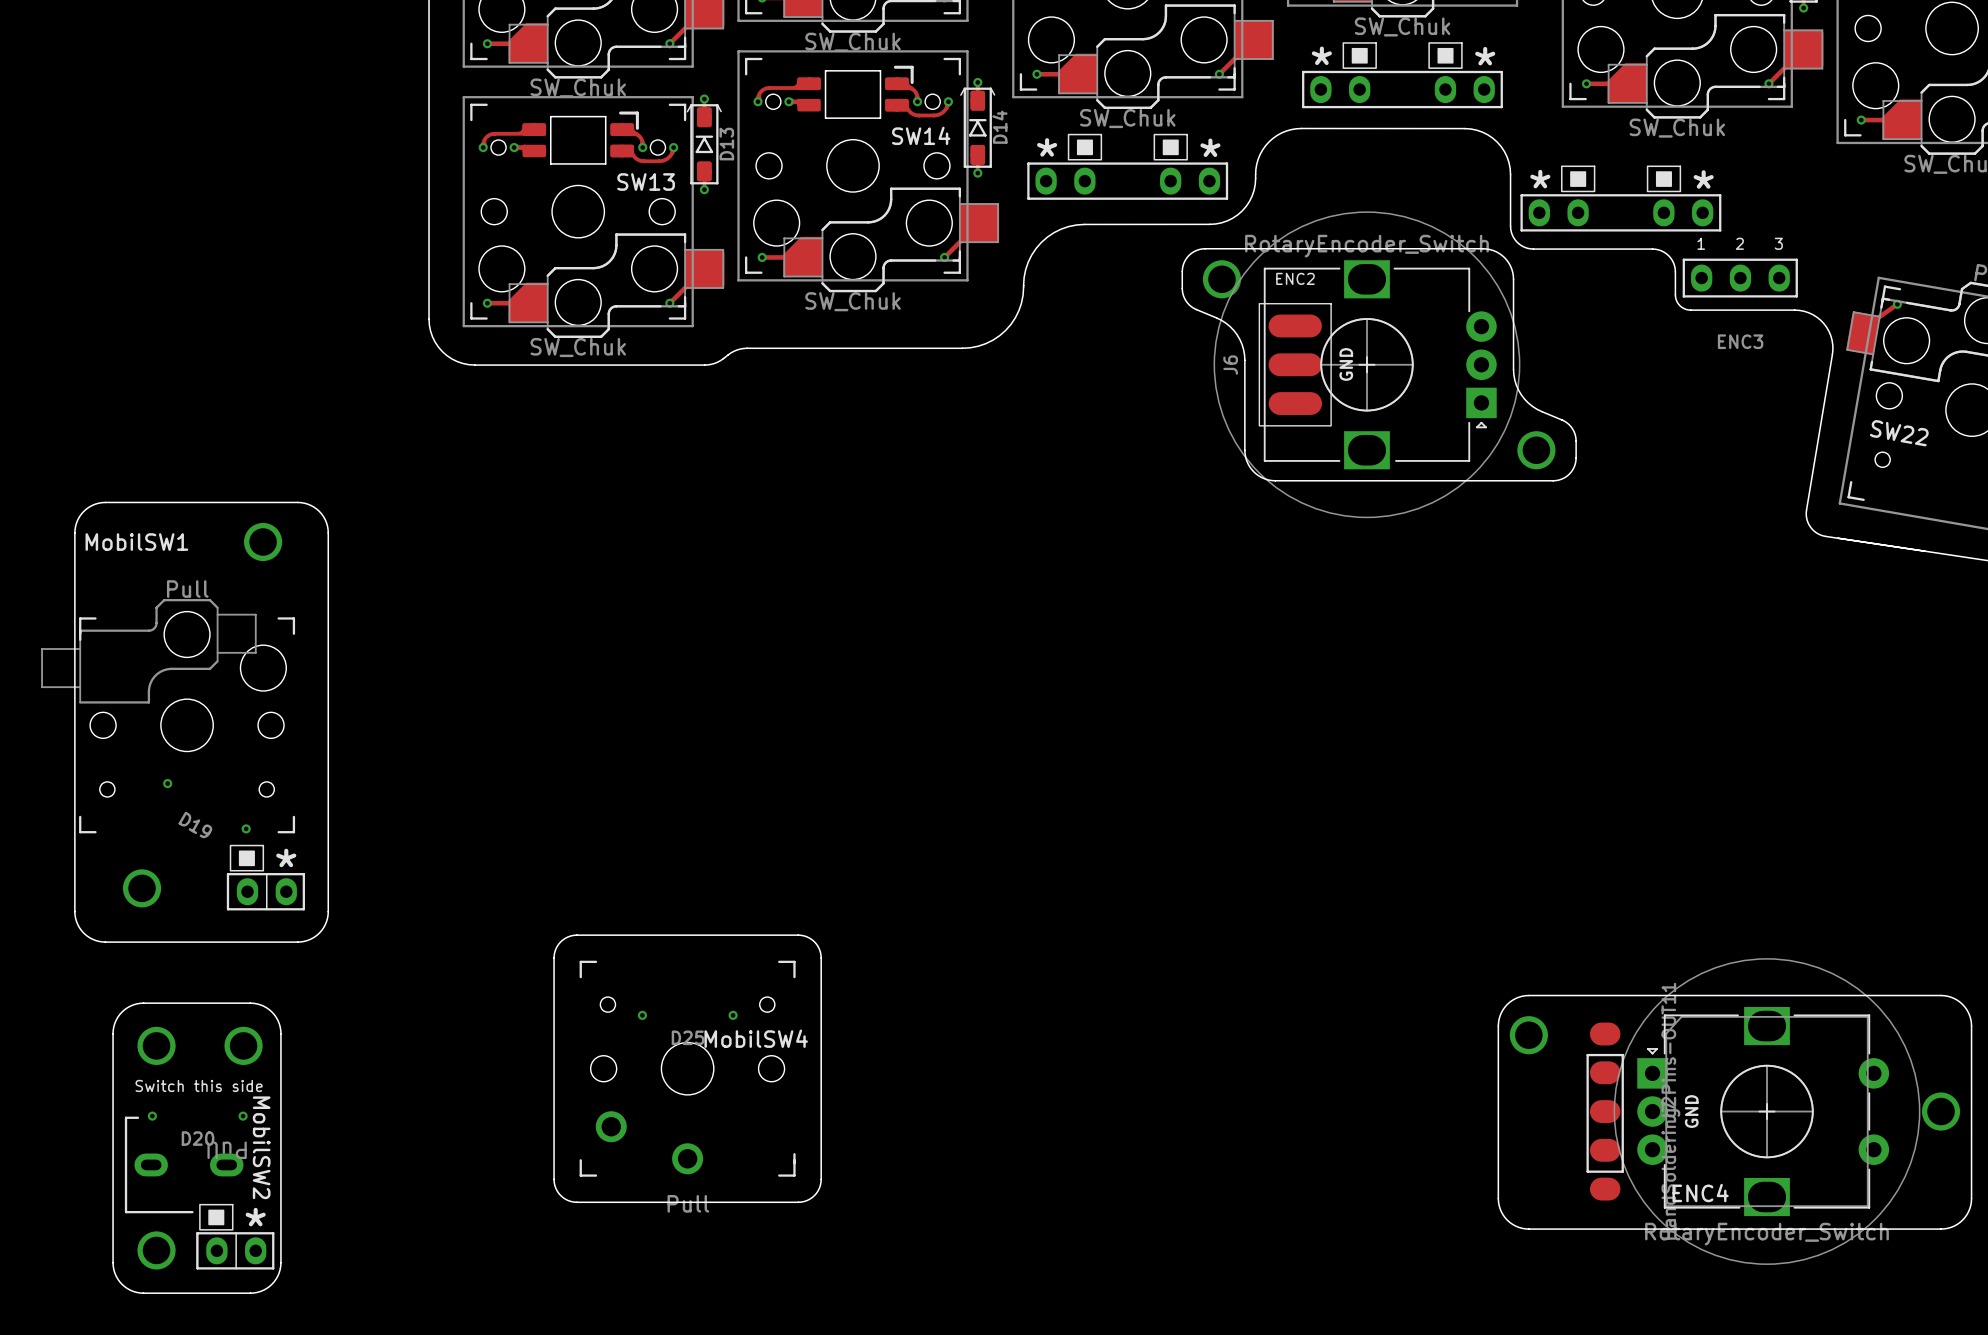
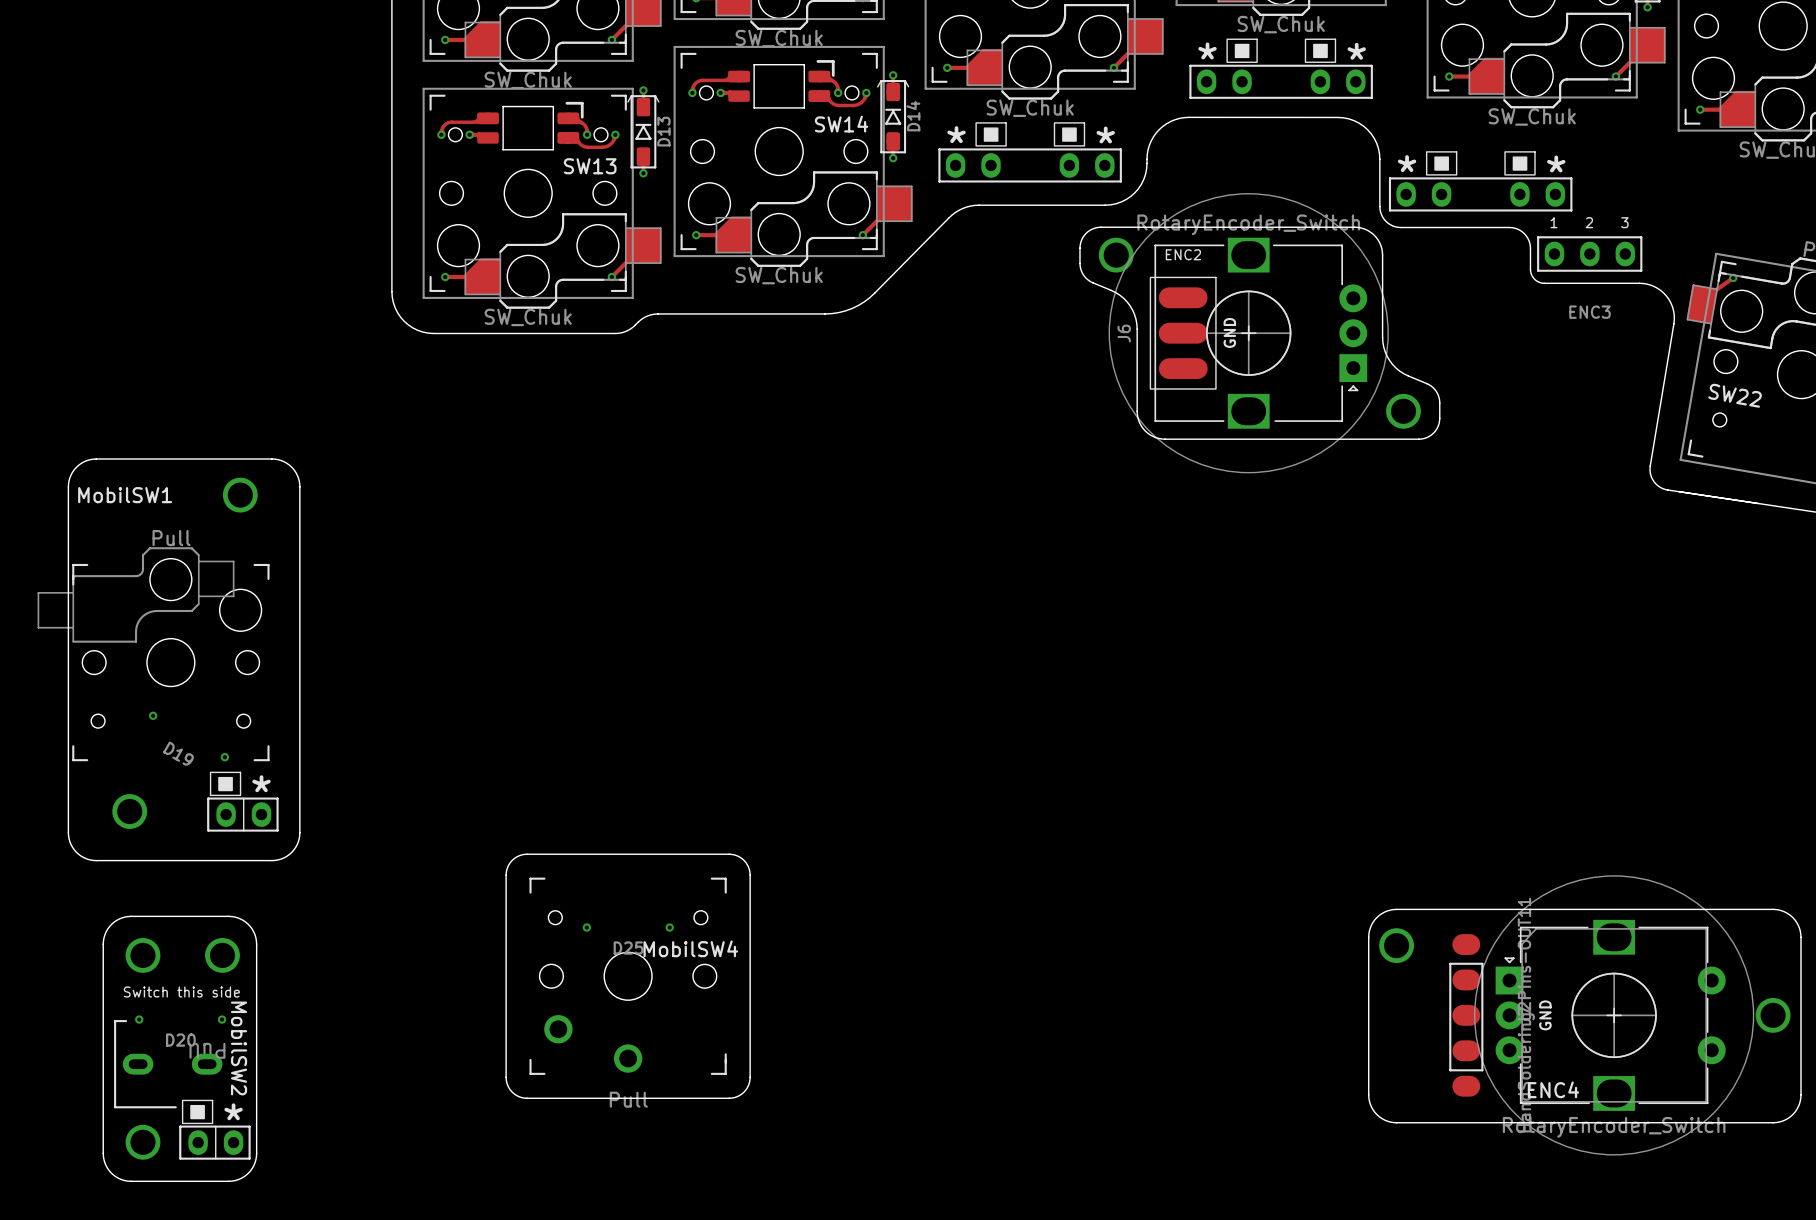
board edge: (1255, 178) (1254, 190) (1246, 206) (1237, 214) (1221, 222) (1084, 224) (1068, 226) (1054, 232) (1036, 248) (1028, 262) (1024, 277) (1021, 303) (1015, 317) (999, 335) (978, 346) (962, 348) (743, 348) (734, 351) (711, 364) (673, 365) -> (1147, 163) (1143, 179) (1138, 188) (1126, 199) (1115, 203) (979, 205) (959, 210) (949, 217) (869, 297) (845, 310) (825, 313) (654, 314) (644, 317) (628, 330) (615, 333)

